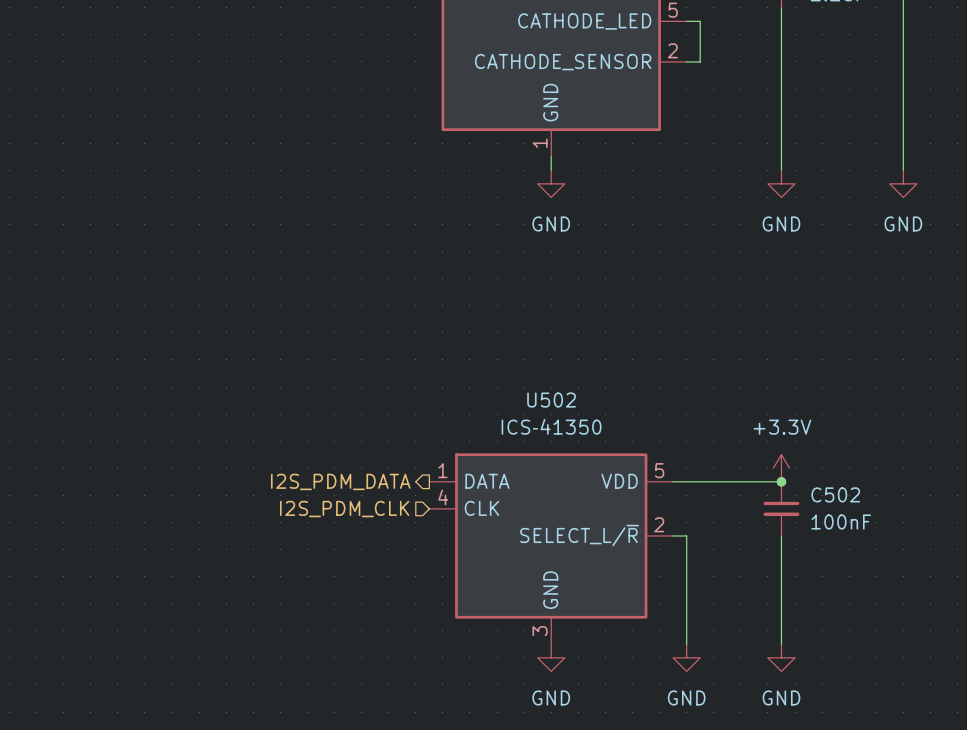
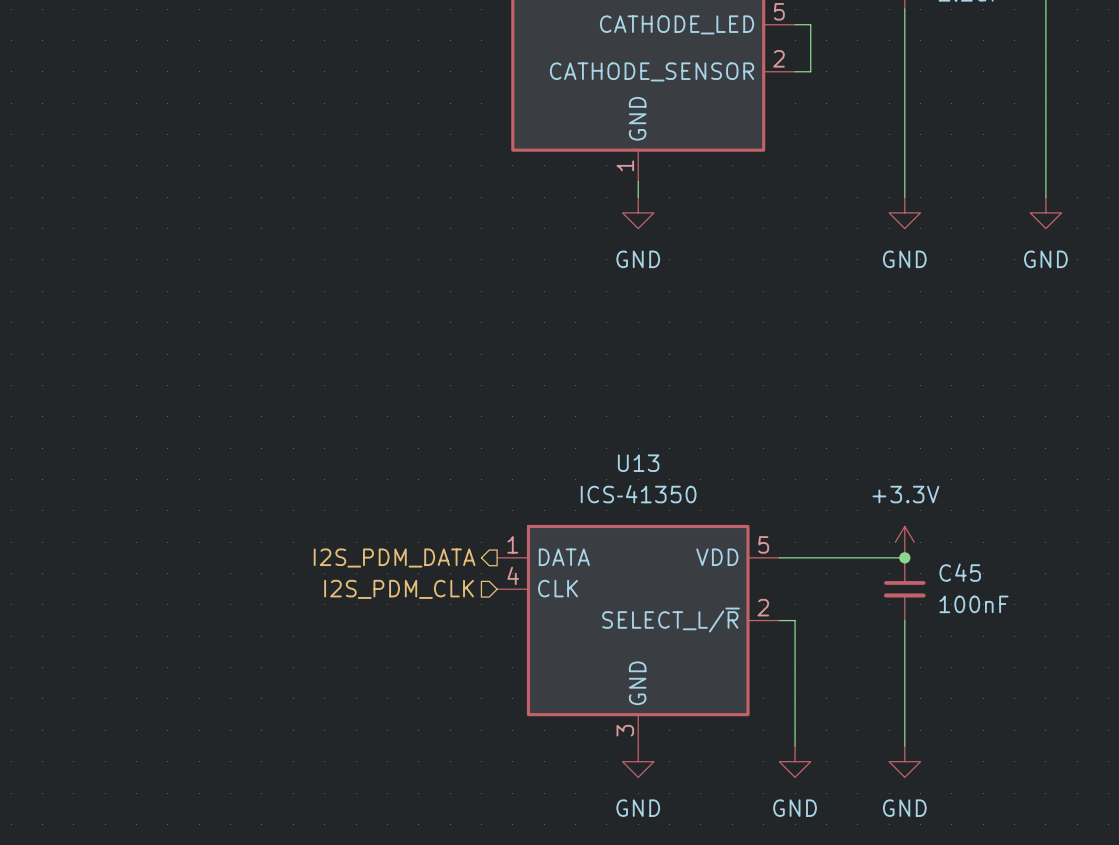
U502 name: U502 (551, 400) -> U13 (638, 463)
C502 name: C502 (835, 494) -> C45 (960, 572)

